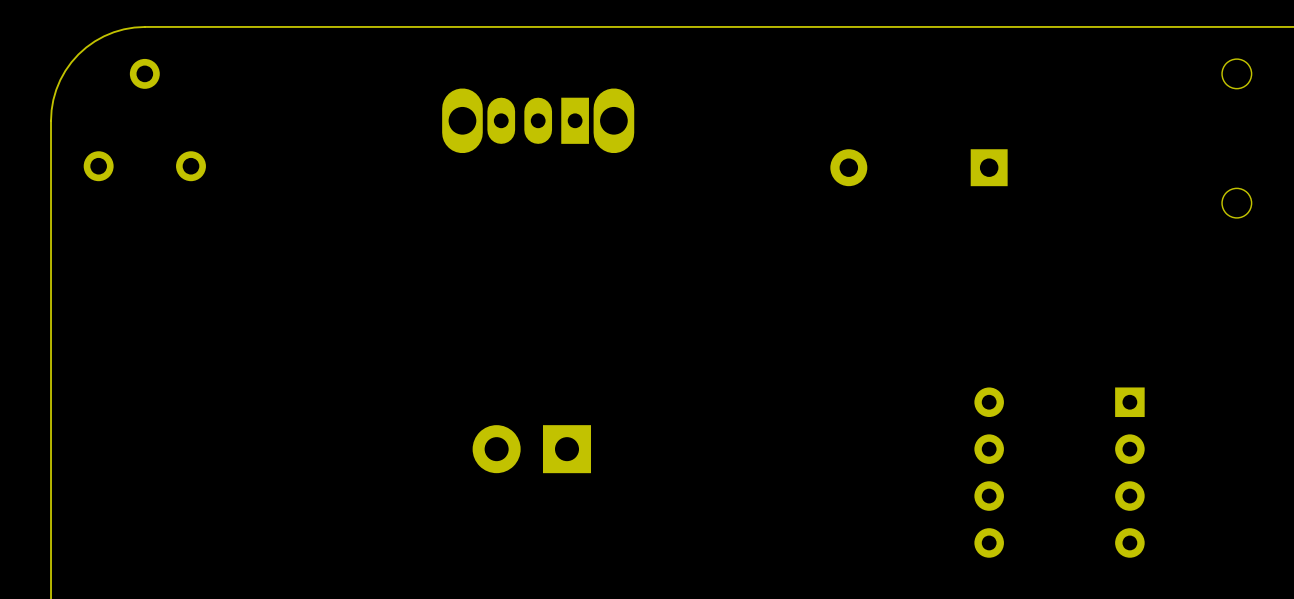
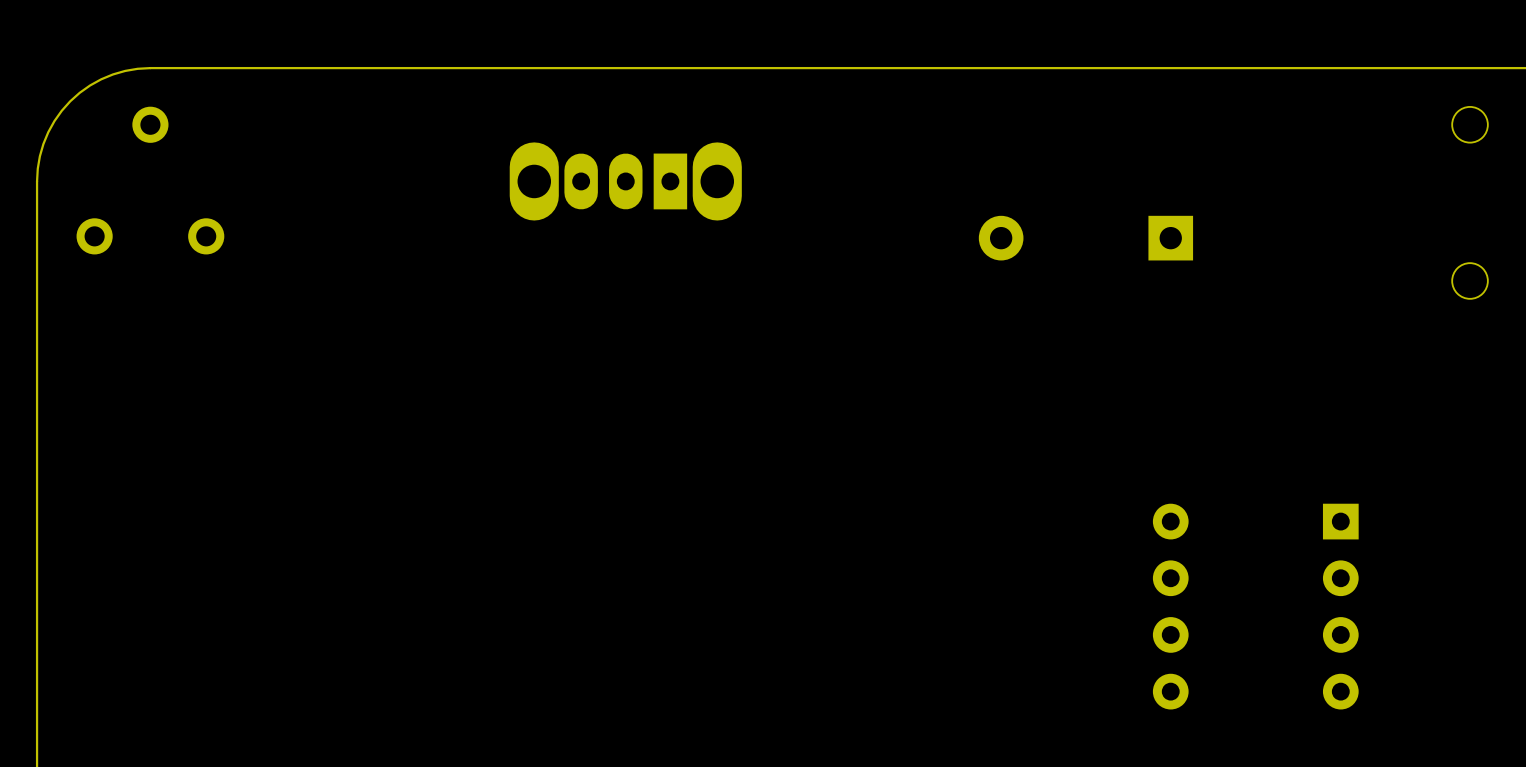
part: (531, 449) -> none

